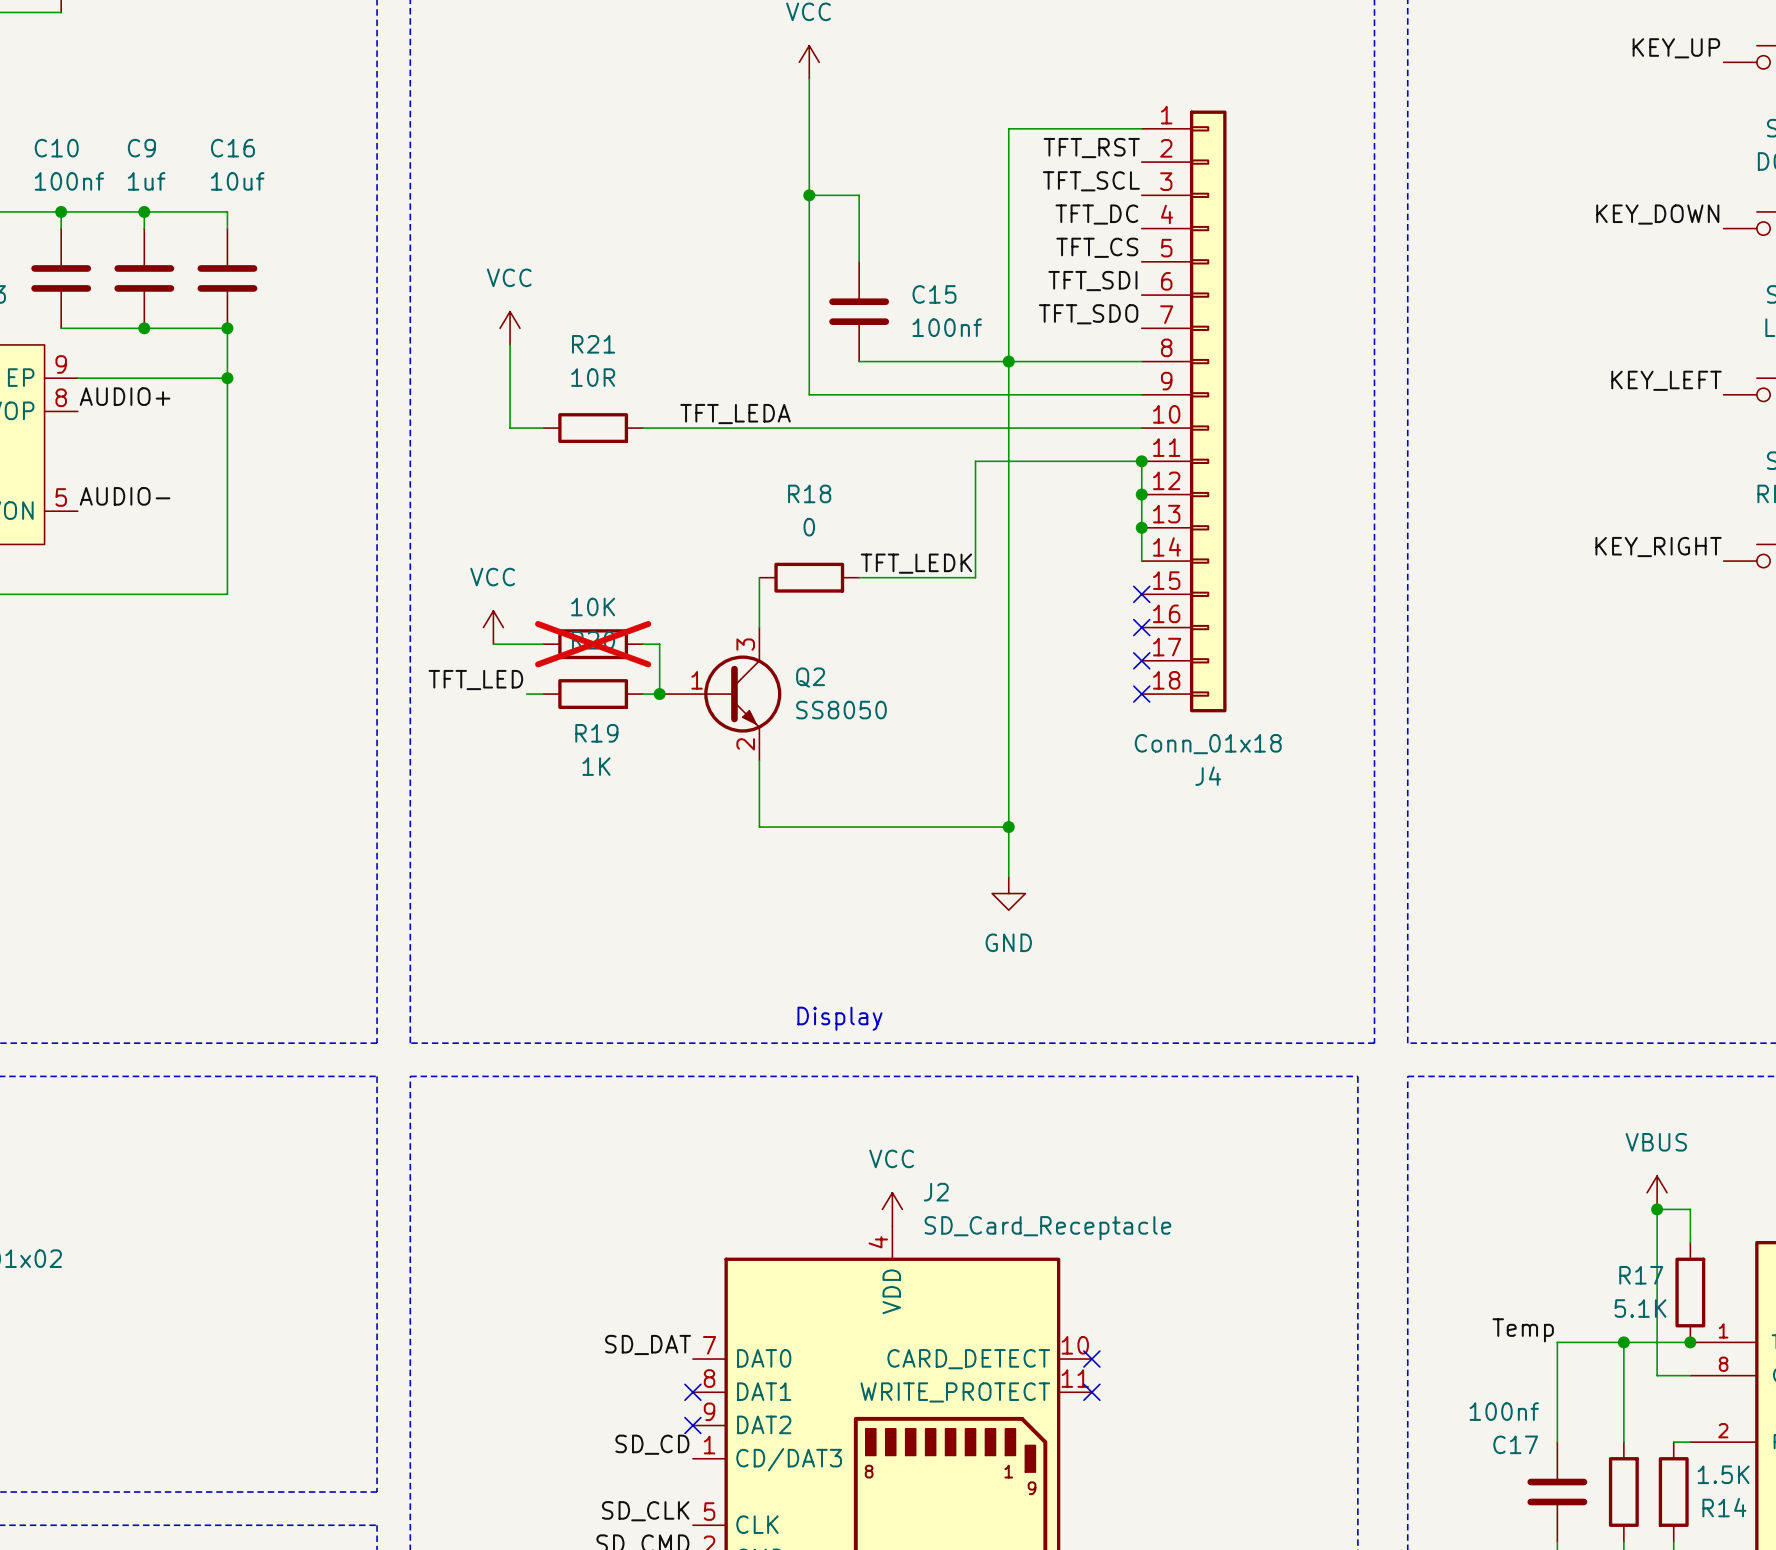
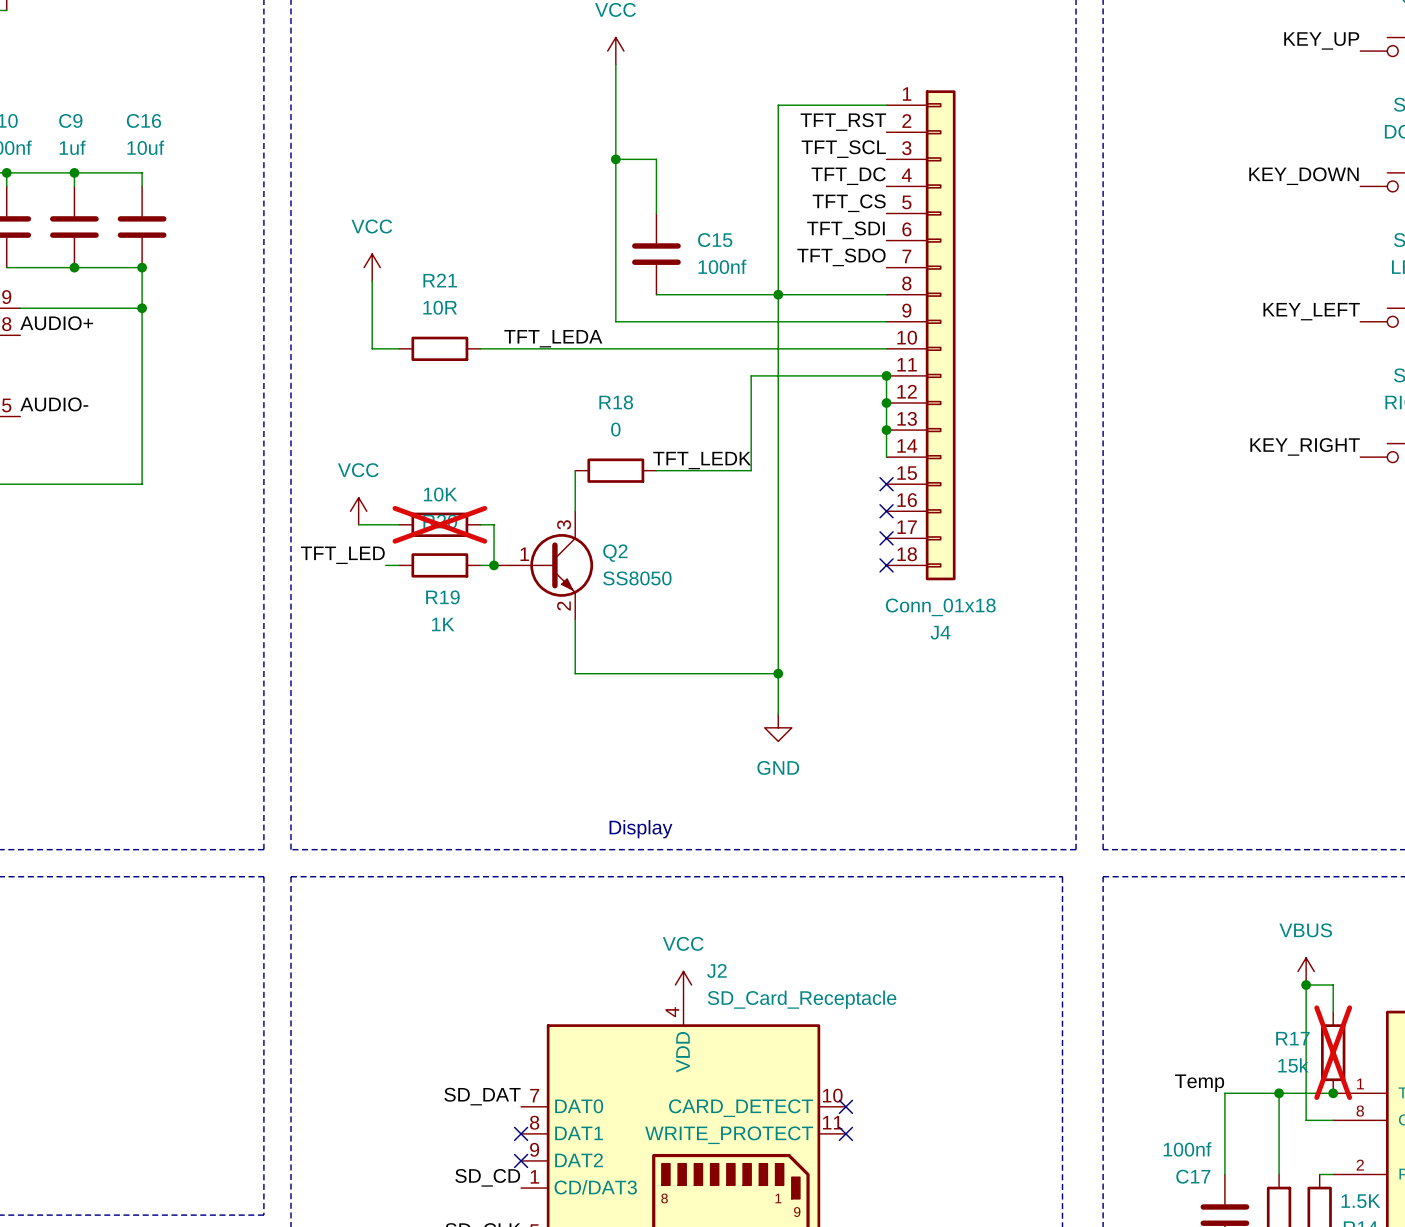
R17 do-not-place cross: none -> (1333, 1052)
R17 value: 5.1K (1640, 1308) -> 15k (1293, 1065)

